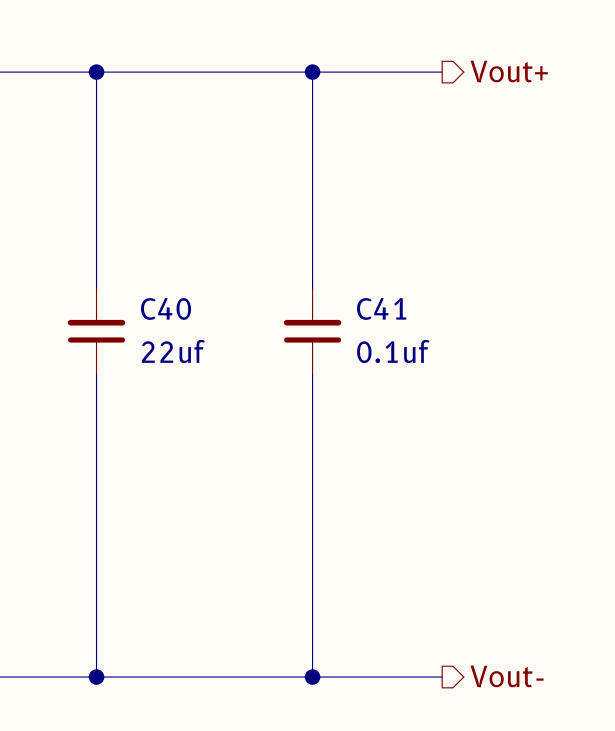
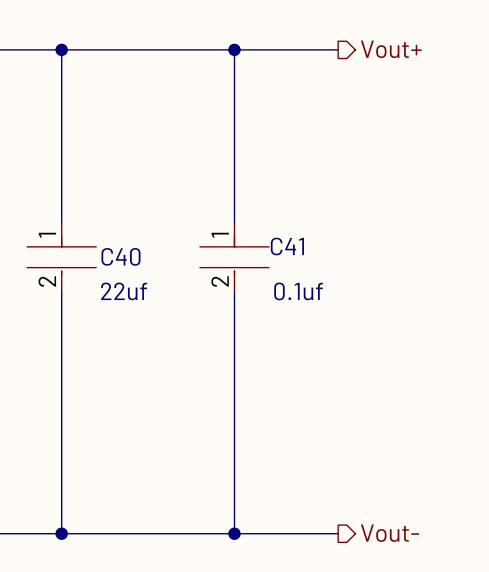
C40 symbol: [67, 288, 126, 375] -> [27, 222, 97, 292]
C41 symbol: [283, 288, 342, 375] -> [199, 222, 270, 292]

